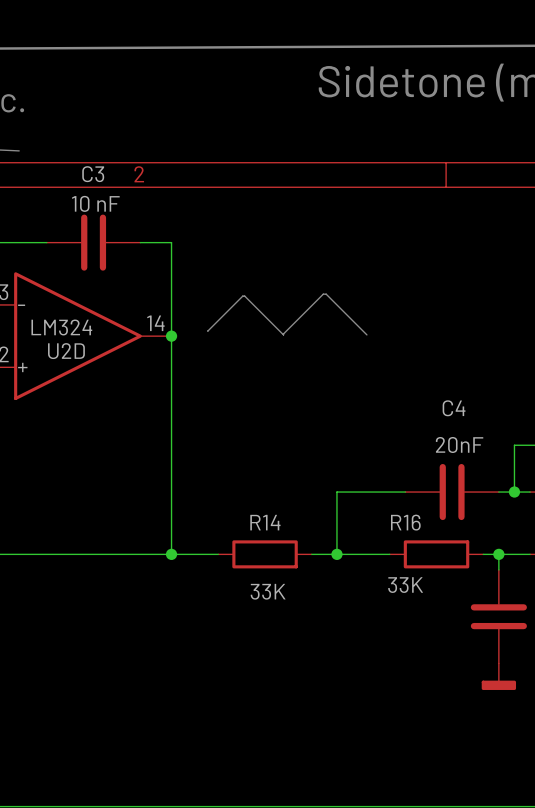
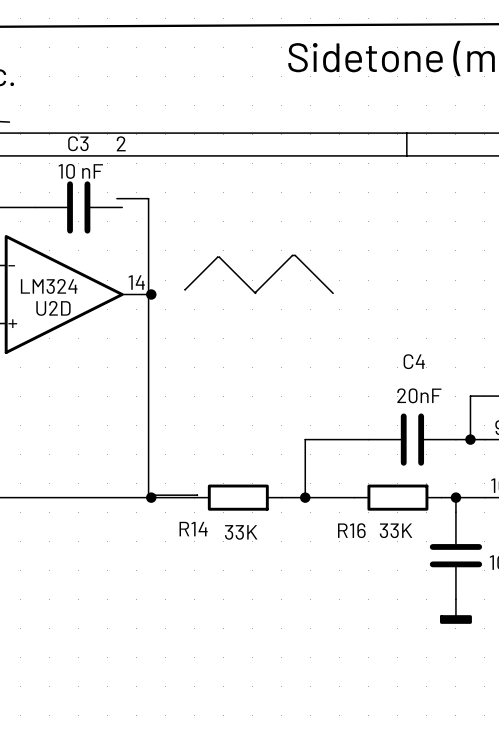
wire: none -> (116, 198) (148, 198) (148, 495) (197, 495)
wire: (140, 242) (171, 242) (171, 554) -> none
R14 name position: R14 (265, 522) -> R14 (193, 529)
R16 name position: R16 (405, 522) -> R16 (351, 530)
R16 value position: 33K (405, 585) -> 33K (396, 530)

